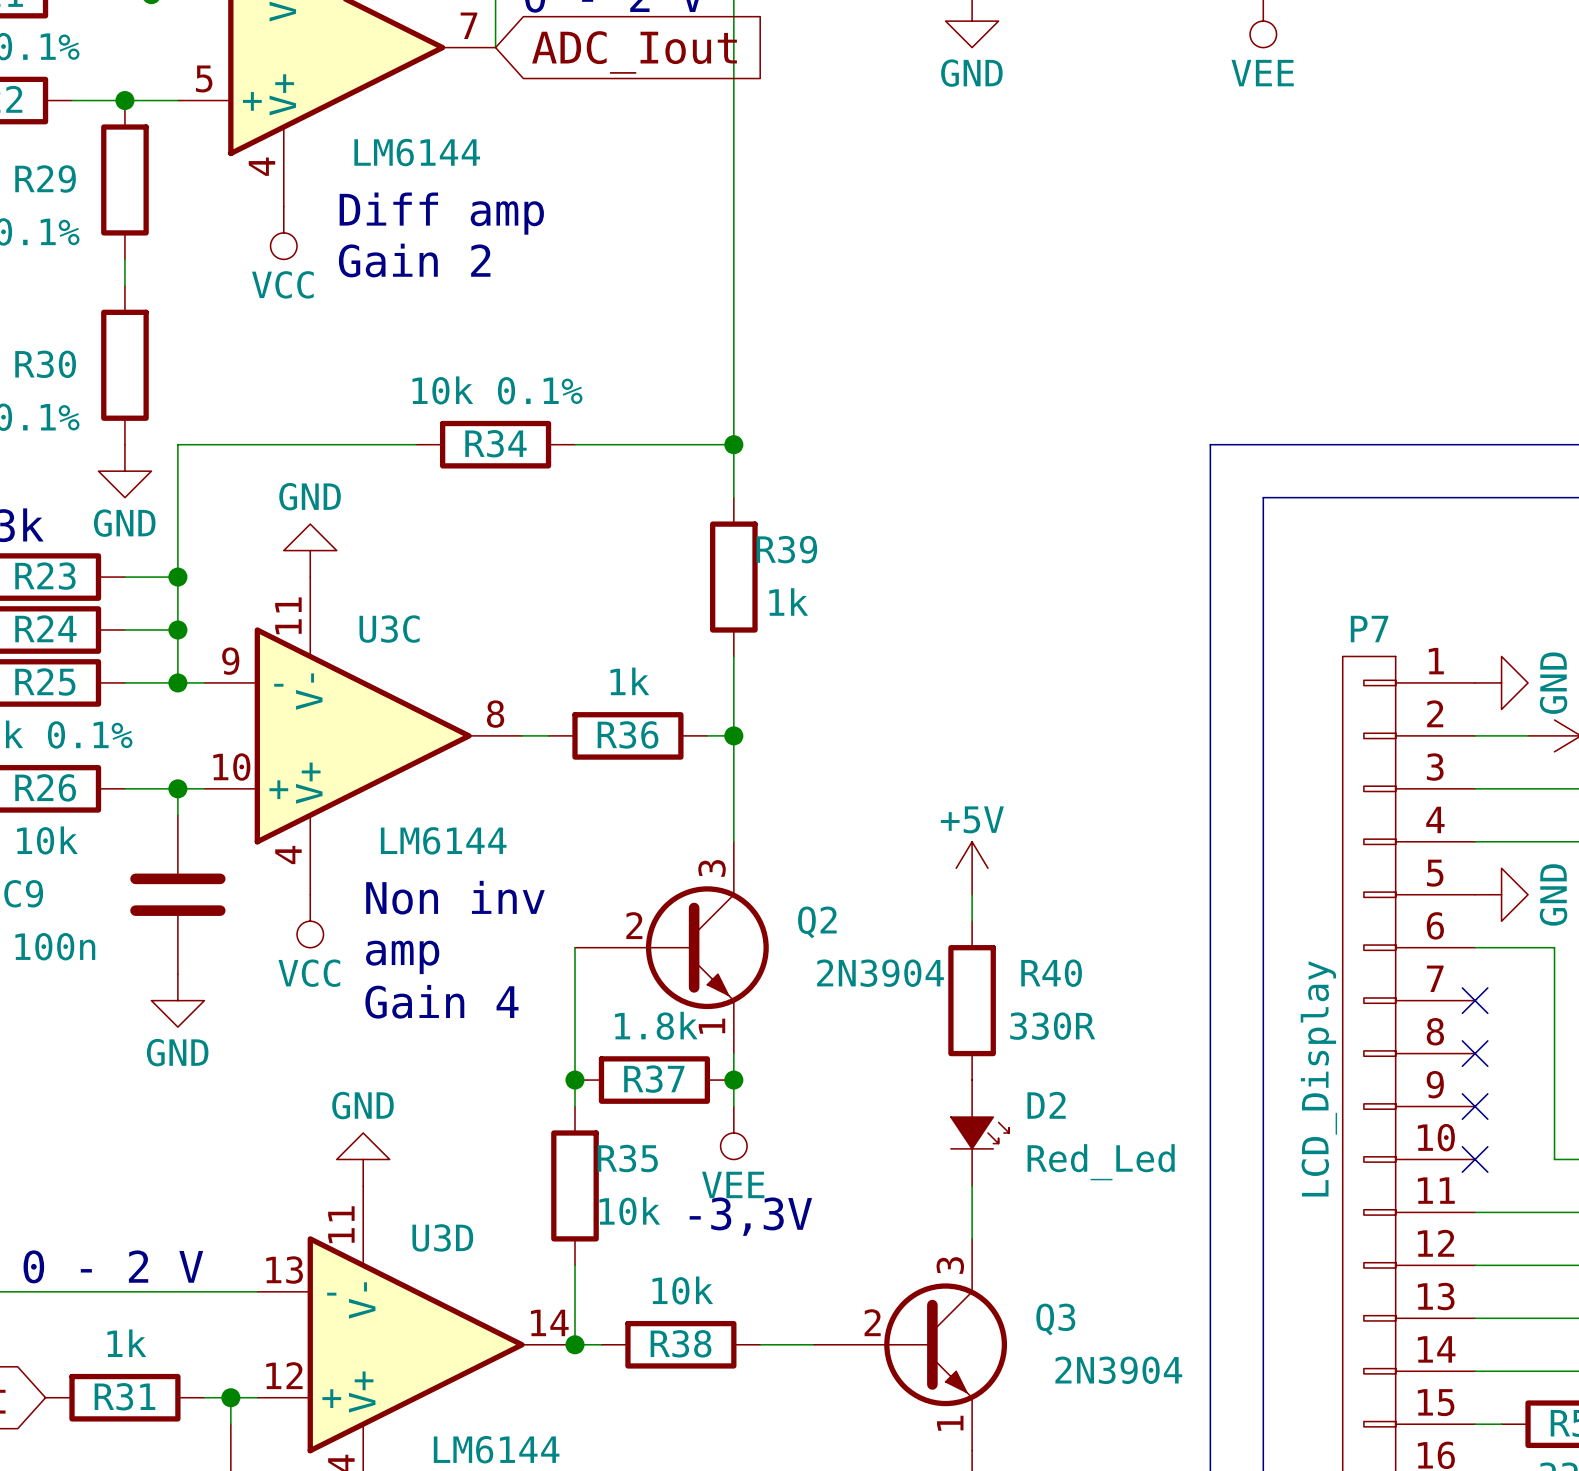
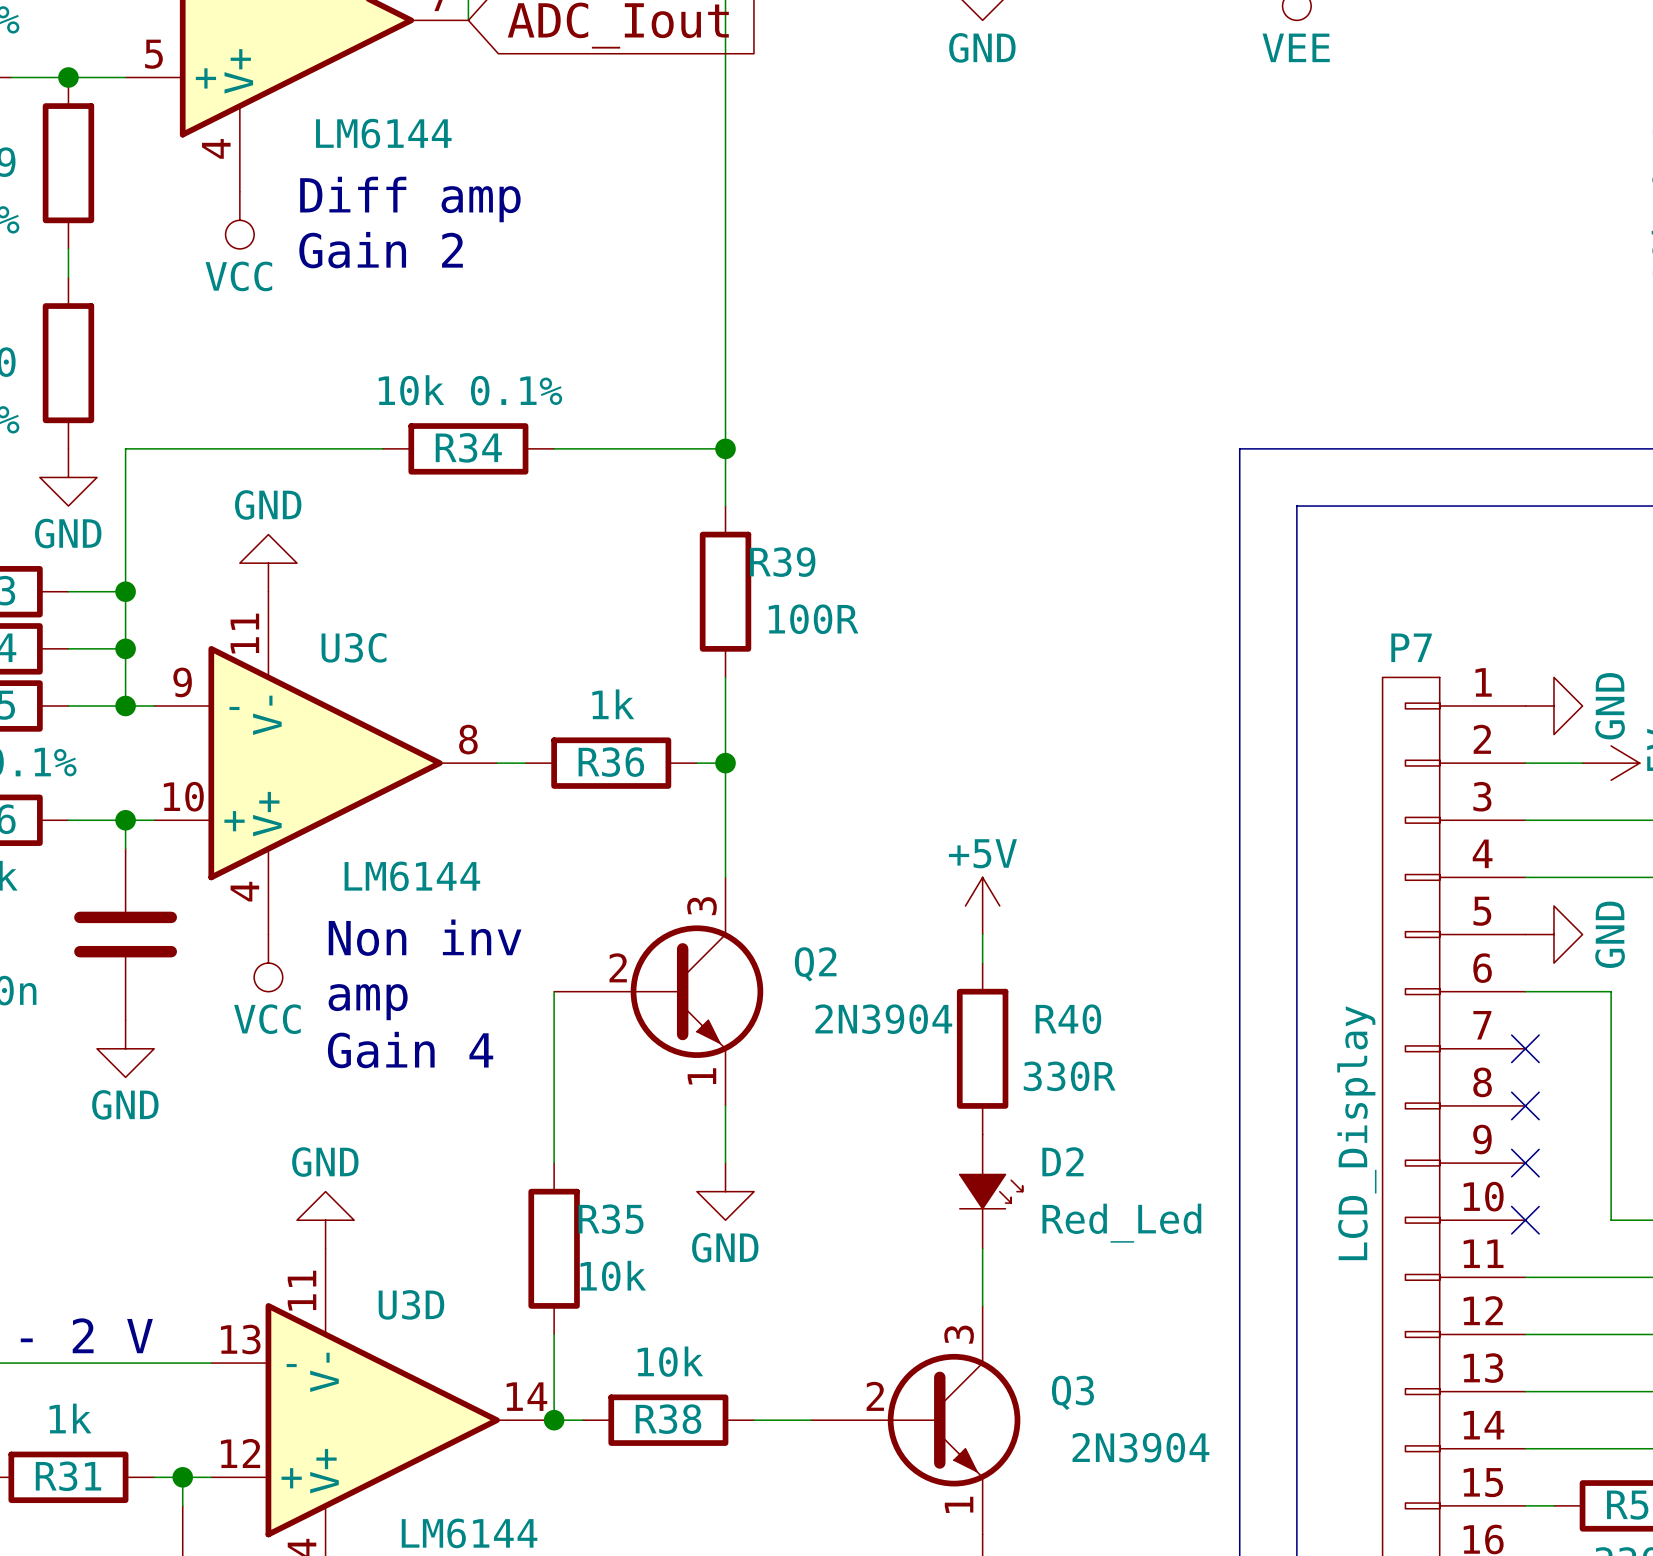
R39 value: 1k (788, 601) -> 100R (813, 619)
junction: (575, 1080) -> none
R37: 1.8k (654, 1080) -> none
junction: (733, 1080) -> none
power symbol: VEE (733, 1133) -> GND (725, 1191)
text: -3,3V (750, 1216) -> none

